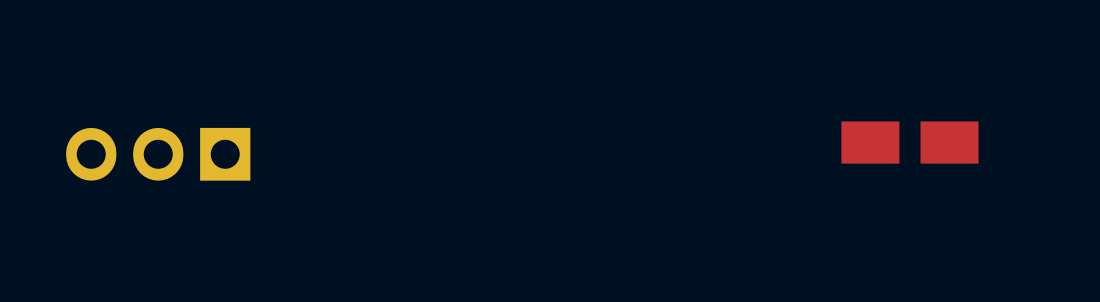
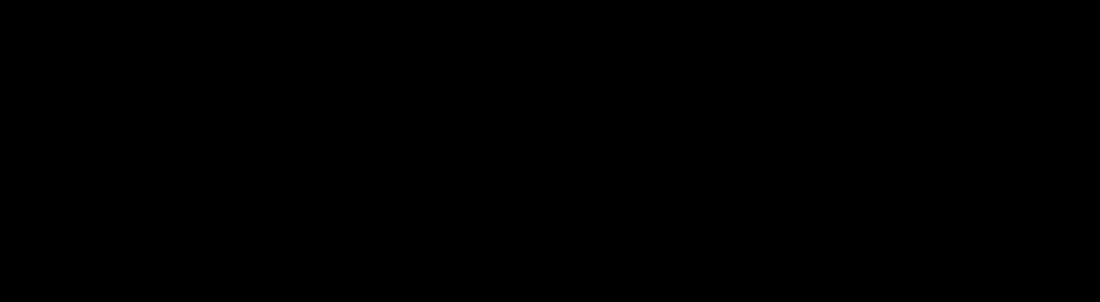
part: (909, 142) -> none
part: (158, 154) -> none

